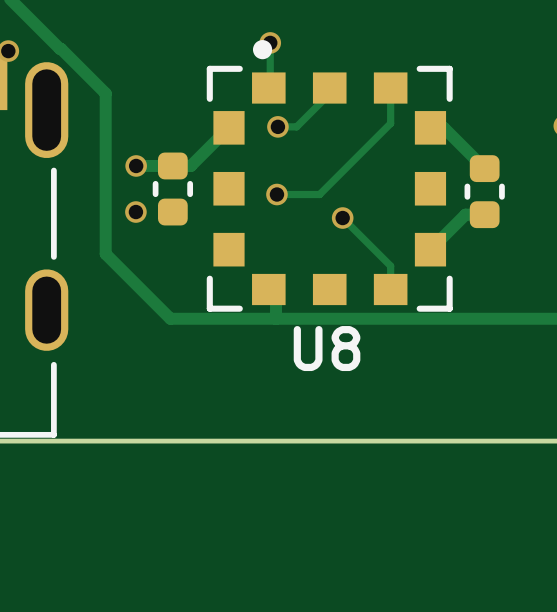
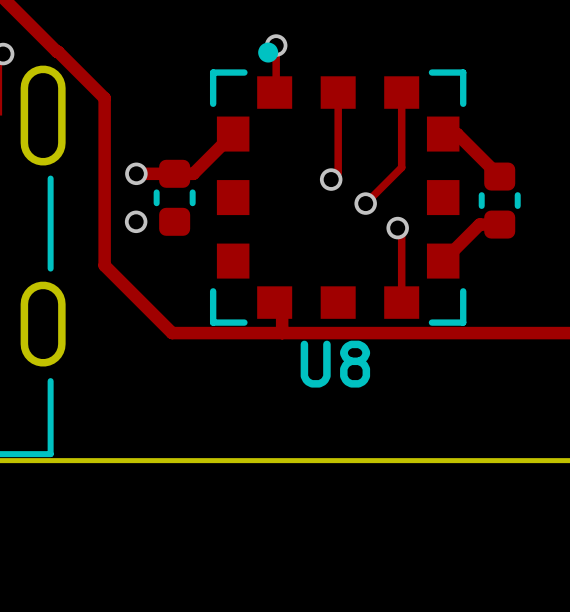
track: (329, 93) (296, 126) (277, 126) -> (338, 98) (338, 172) (331, 179)
track: (390, 123) (319, 194) (276, 194) -> (401, 129) (401, 167) (365, 203)
via: (277, 126) -> none
via: none -> (331, 179)
via: (276, 194) -> none
via: none -> (365, 203)
track: (342, 218) (390, 265) -> (397, 228) (401, 232) (401, 278)
via: (342, 218) -> none
via: none -> (397, 228)

